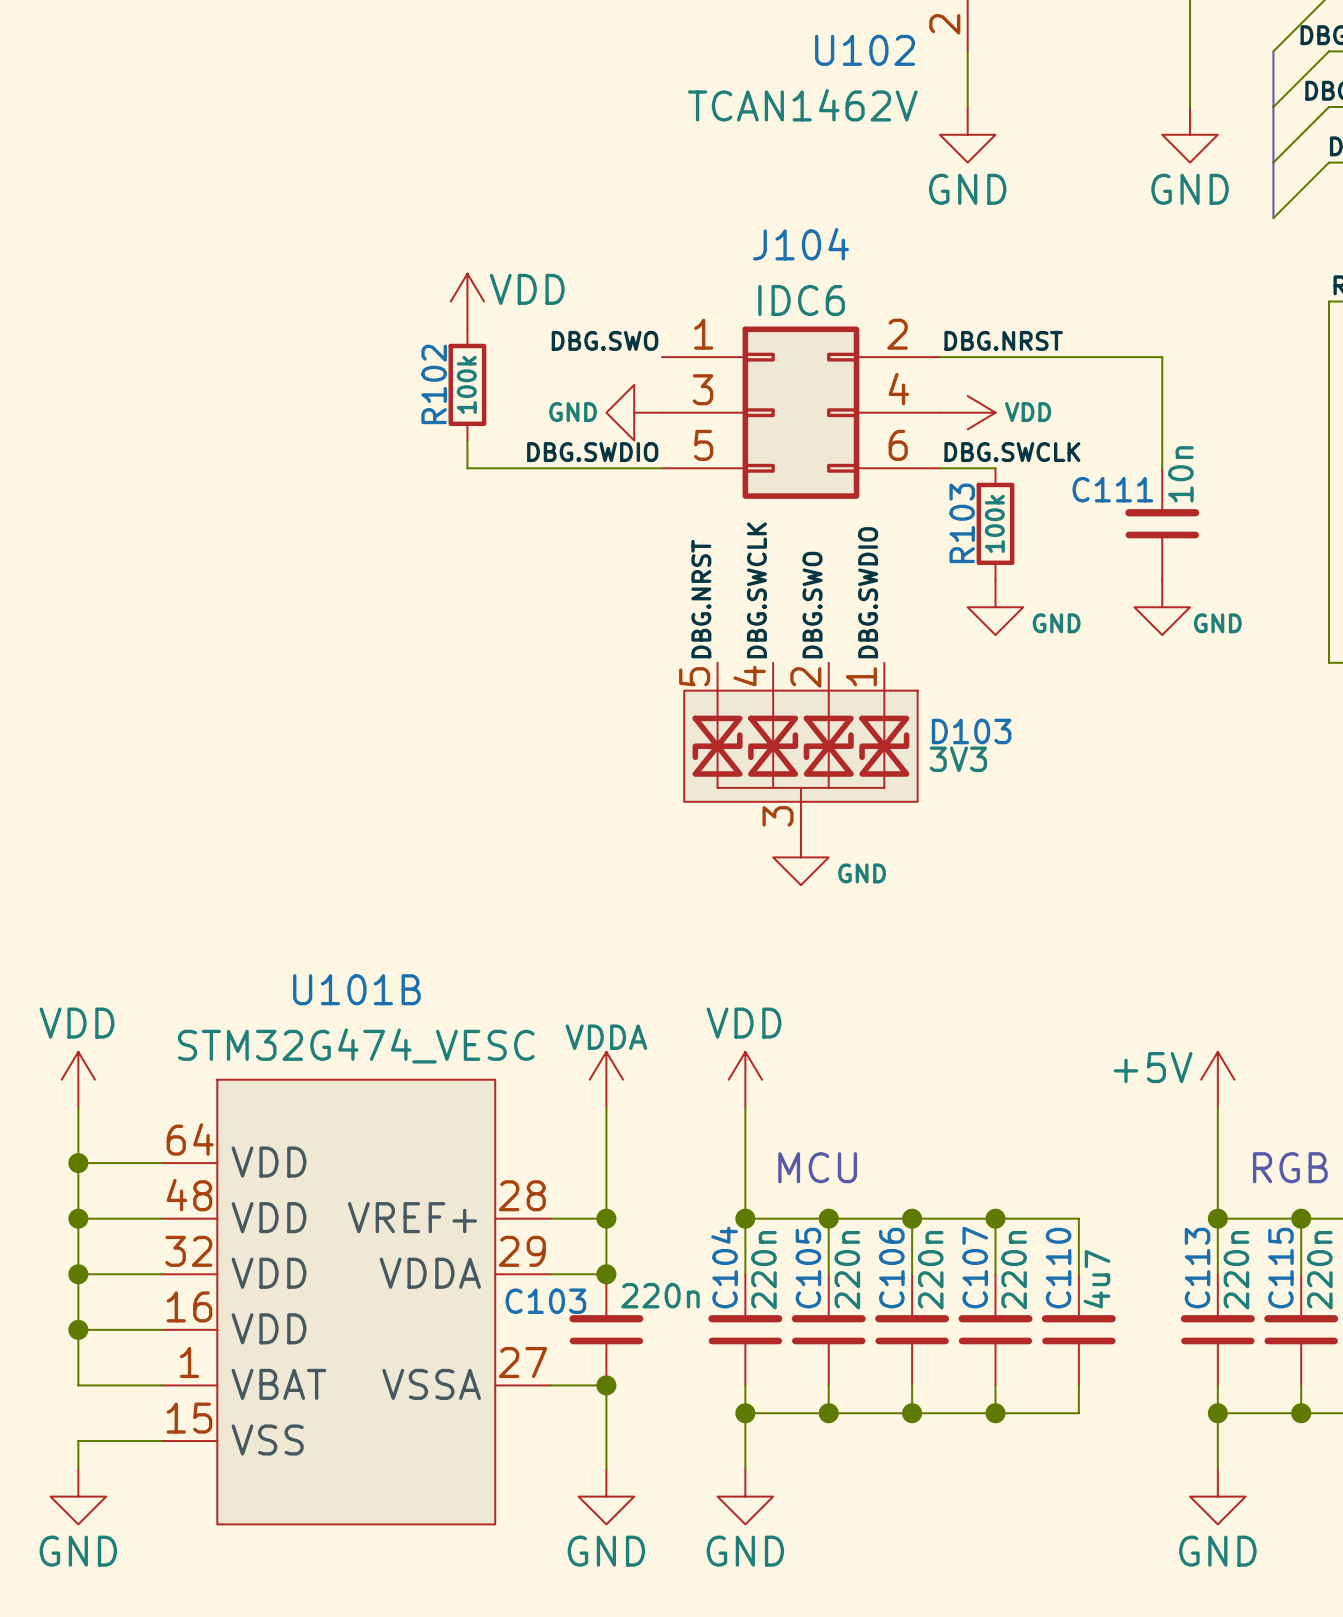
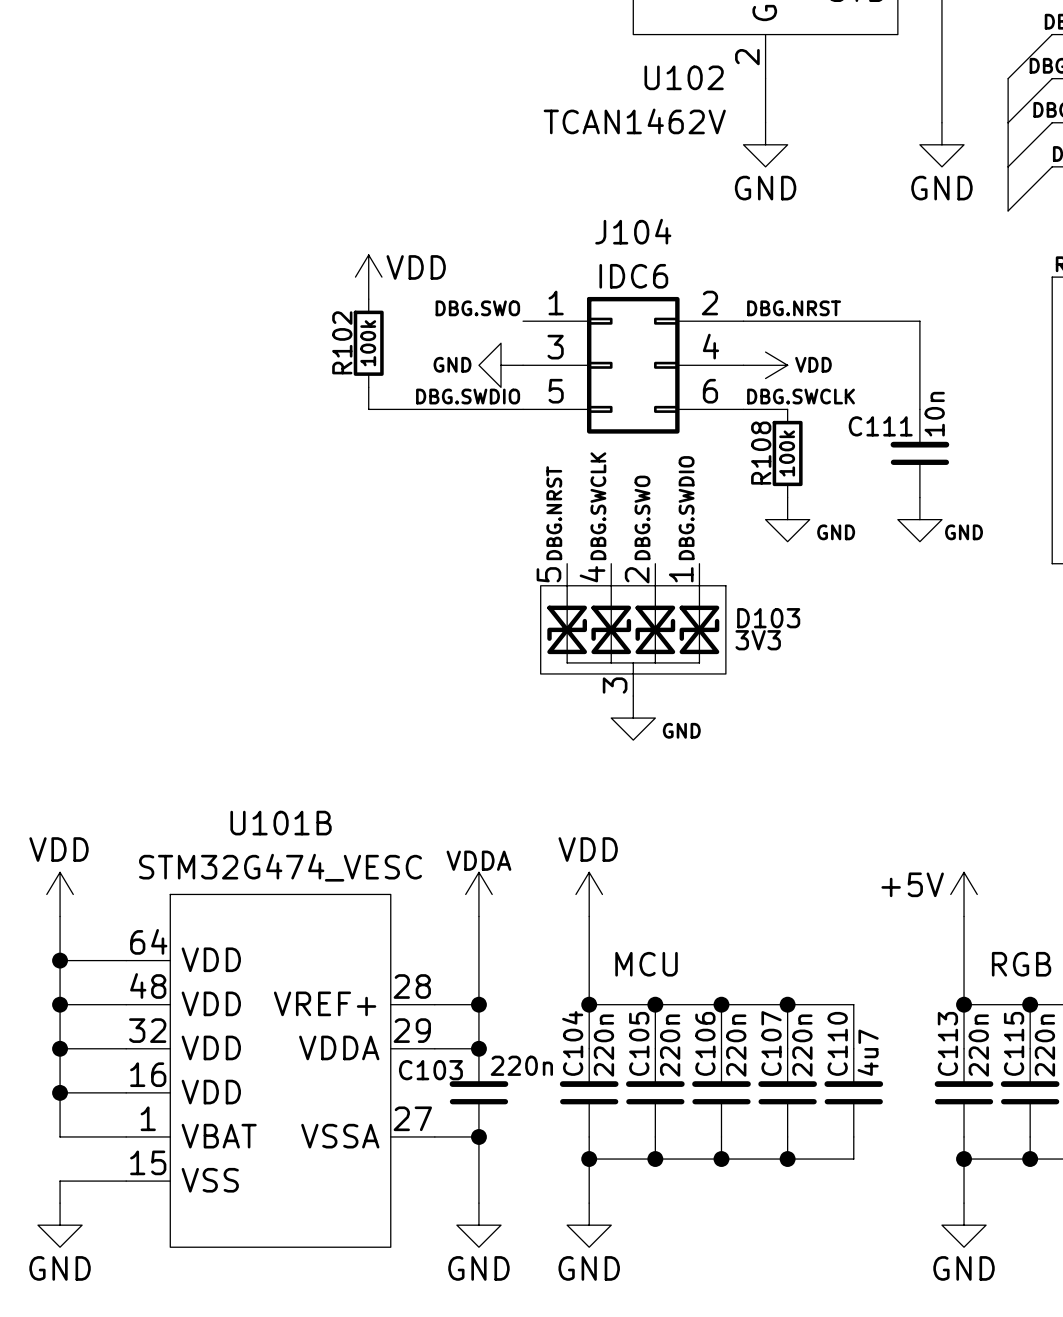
R103 name: R103 (962, 523) -> R108 (761, 453)

